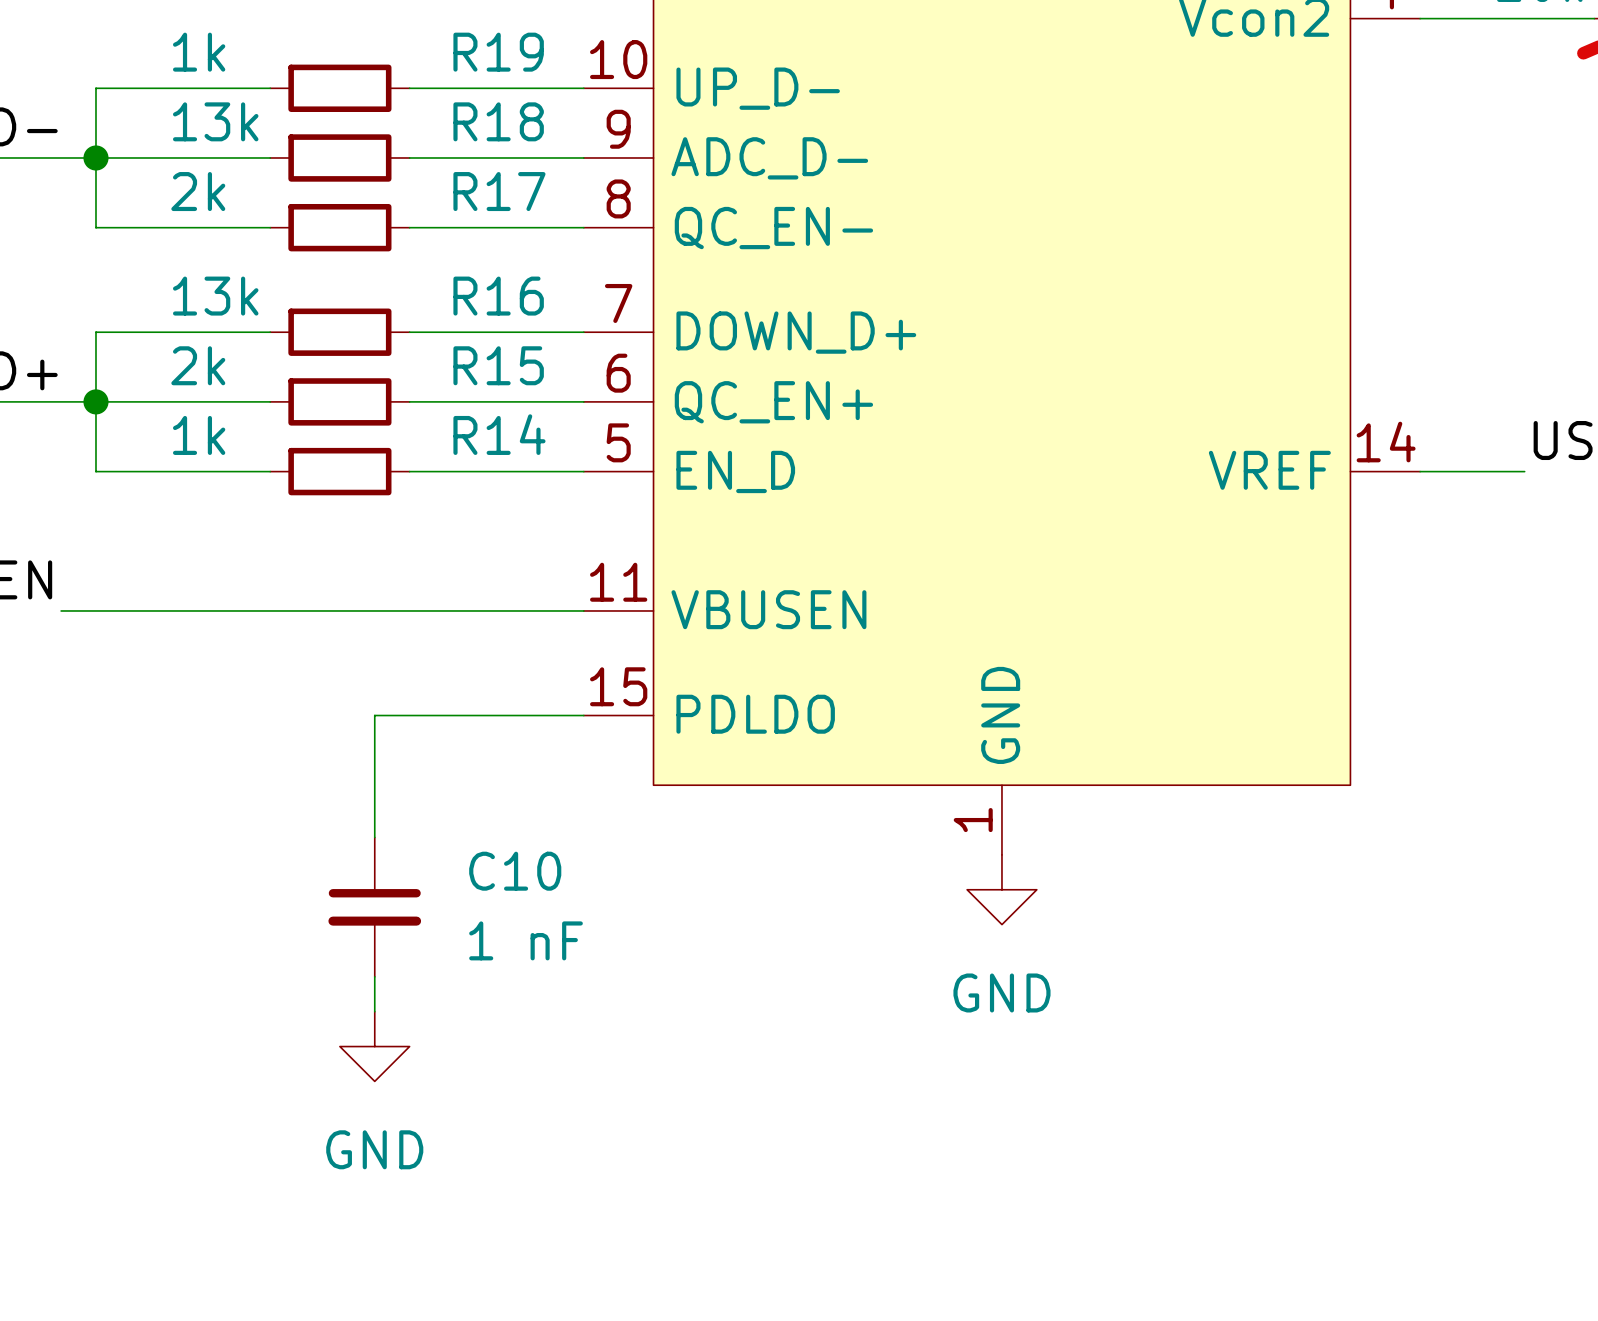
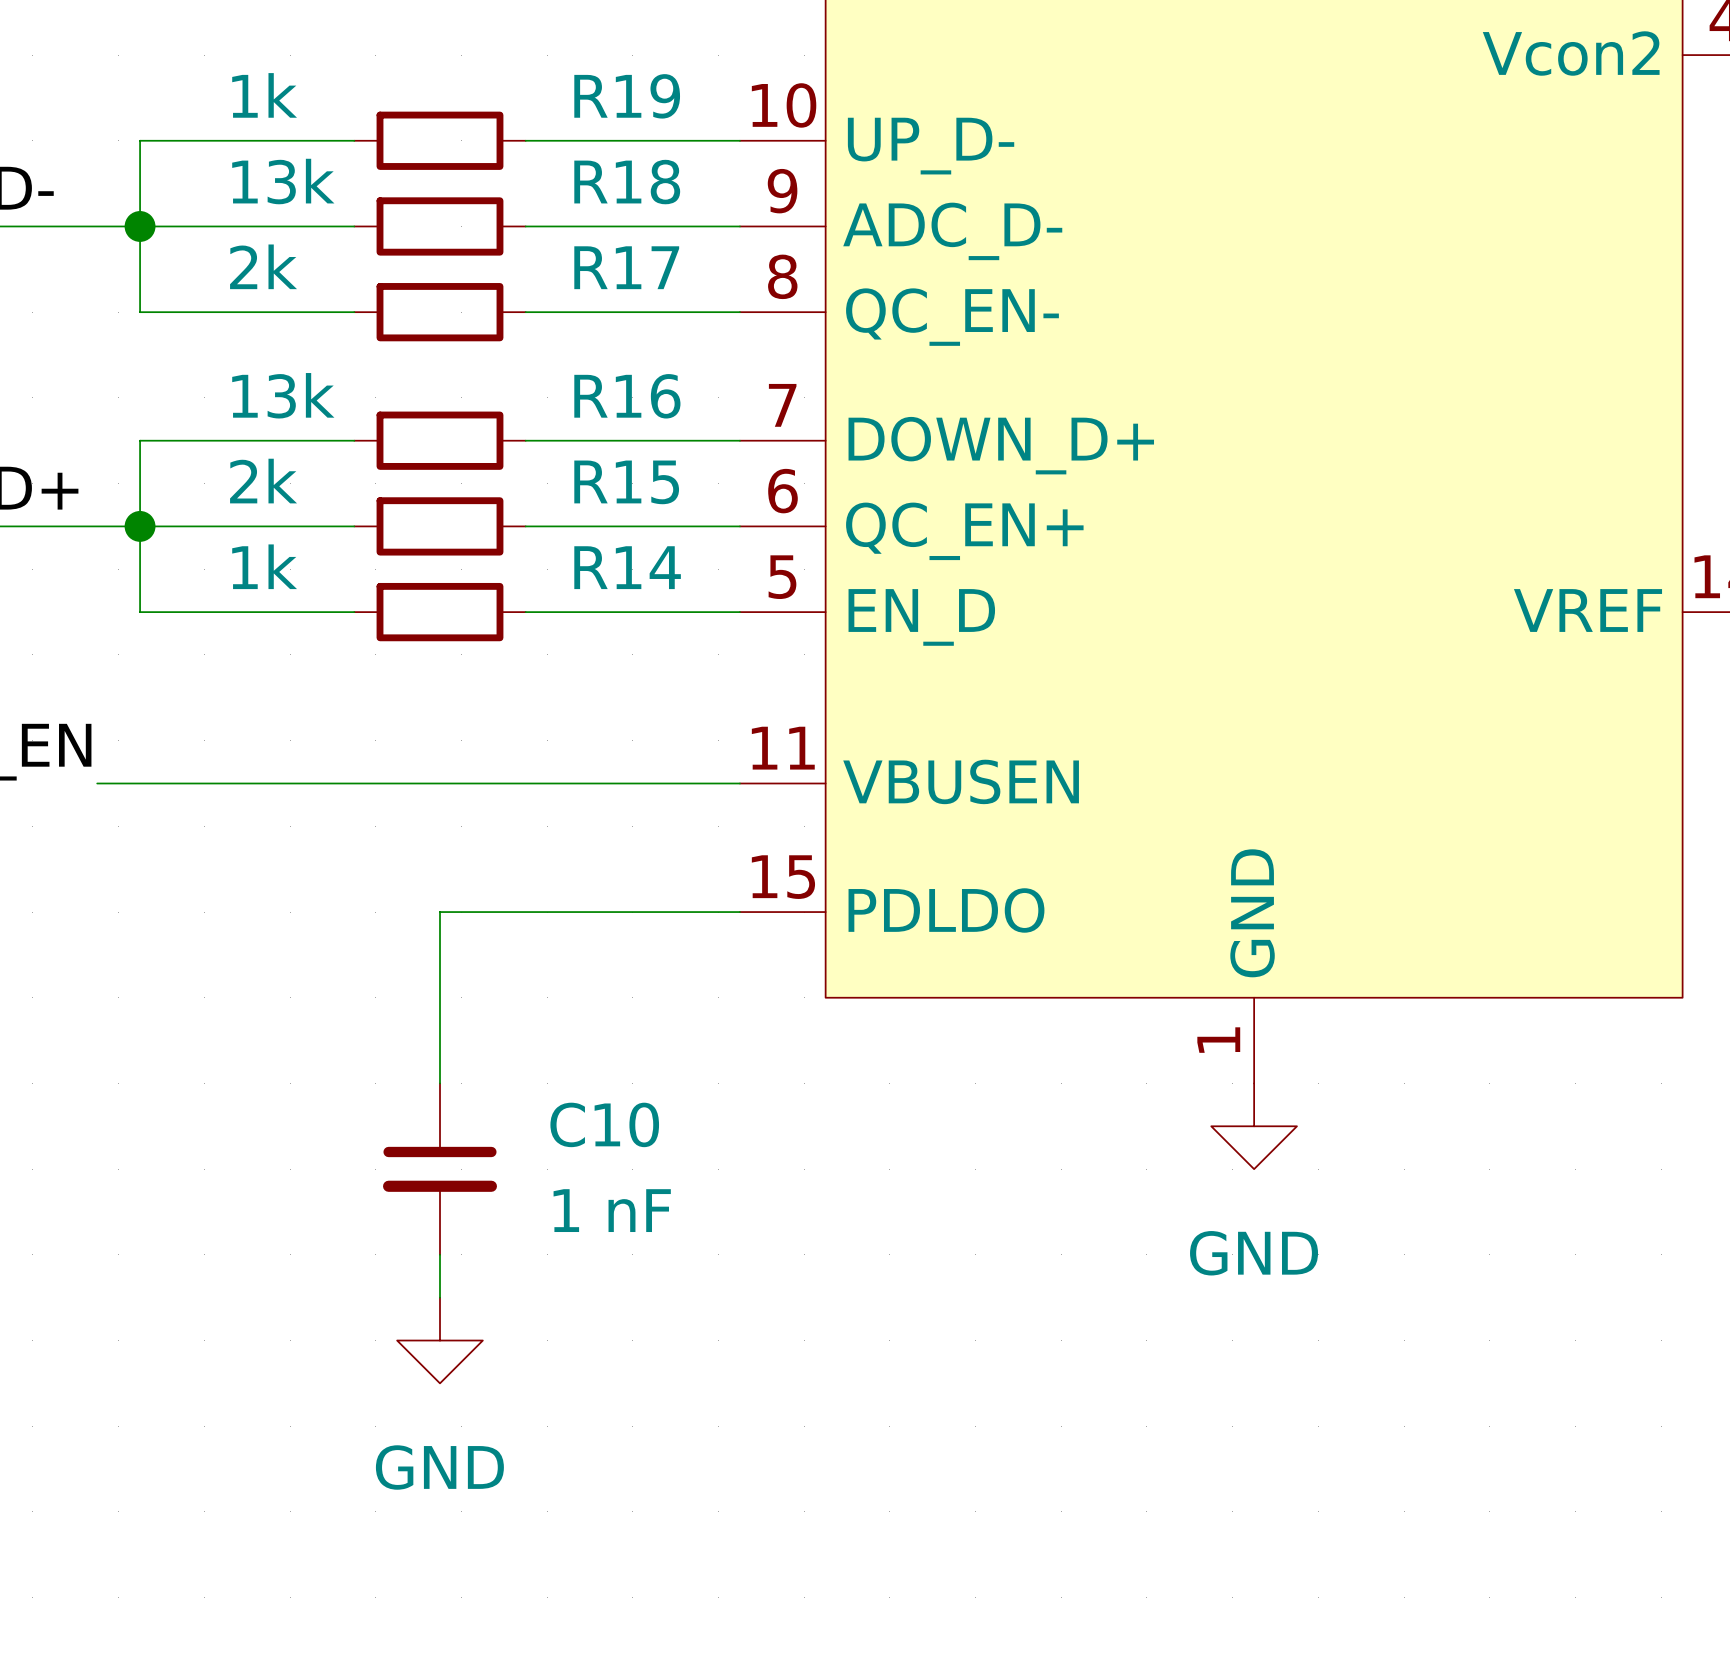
wire: (374, 715) (374, 837) -> (482, 912) (439, 912) (439, 1083)
C10 position: (374, 907) -> (439, 1169)
wire: (374, 976) (374, 1011) -> (439, 1254) (439, 1297)
power symbol position: GND (374, 1046) -> GND (439, 1340)

